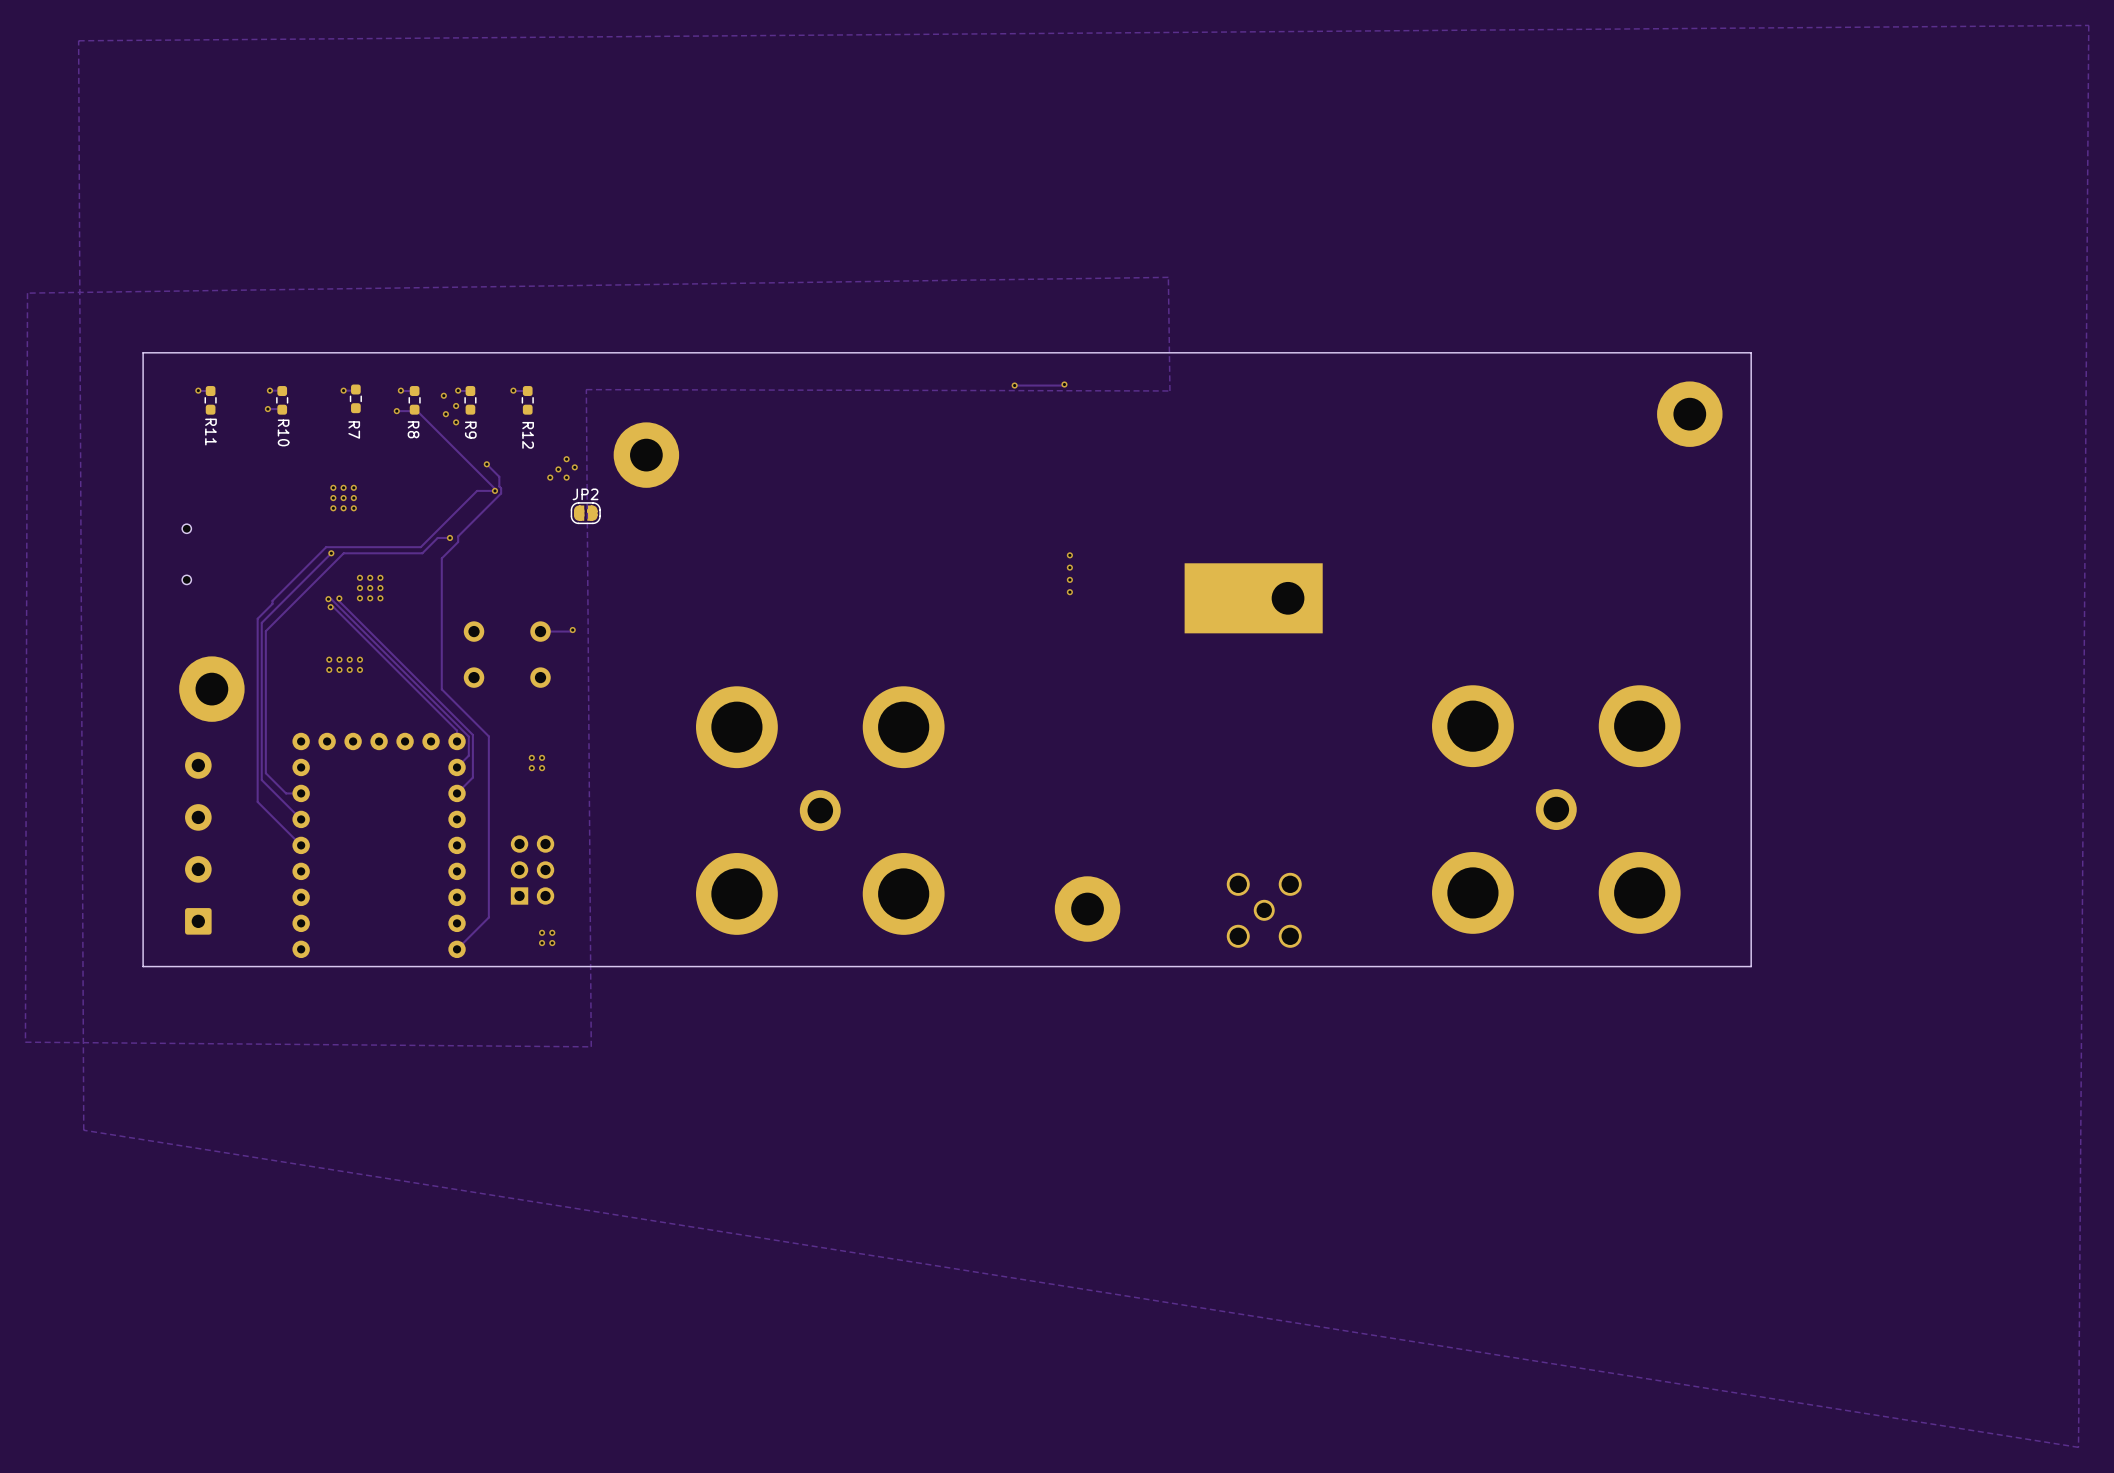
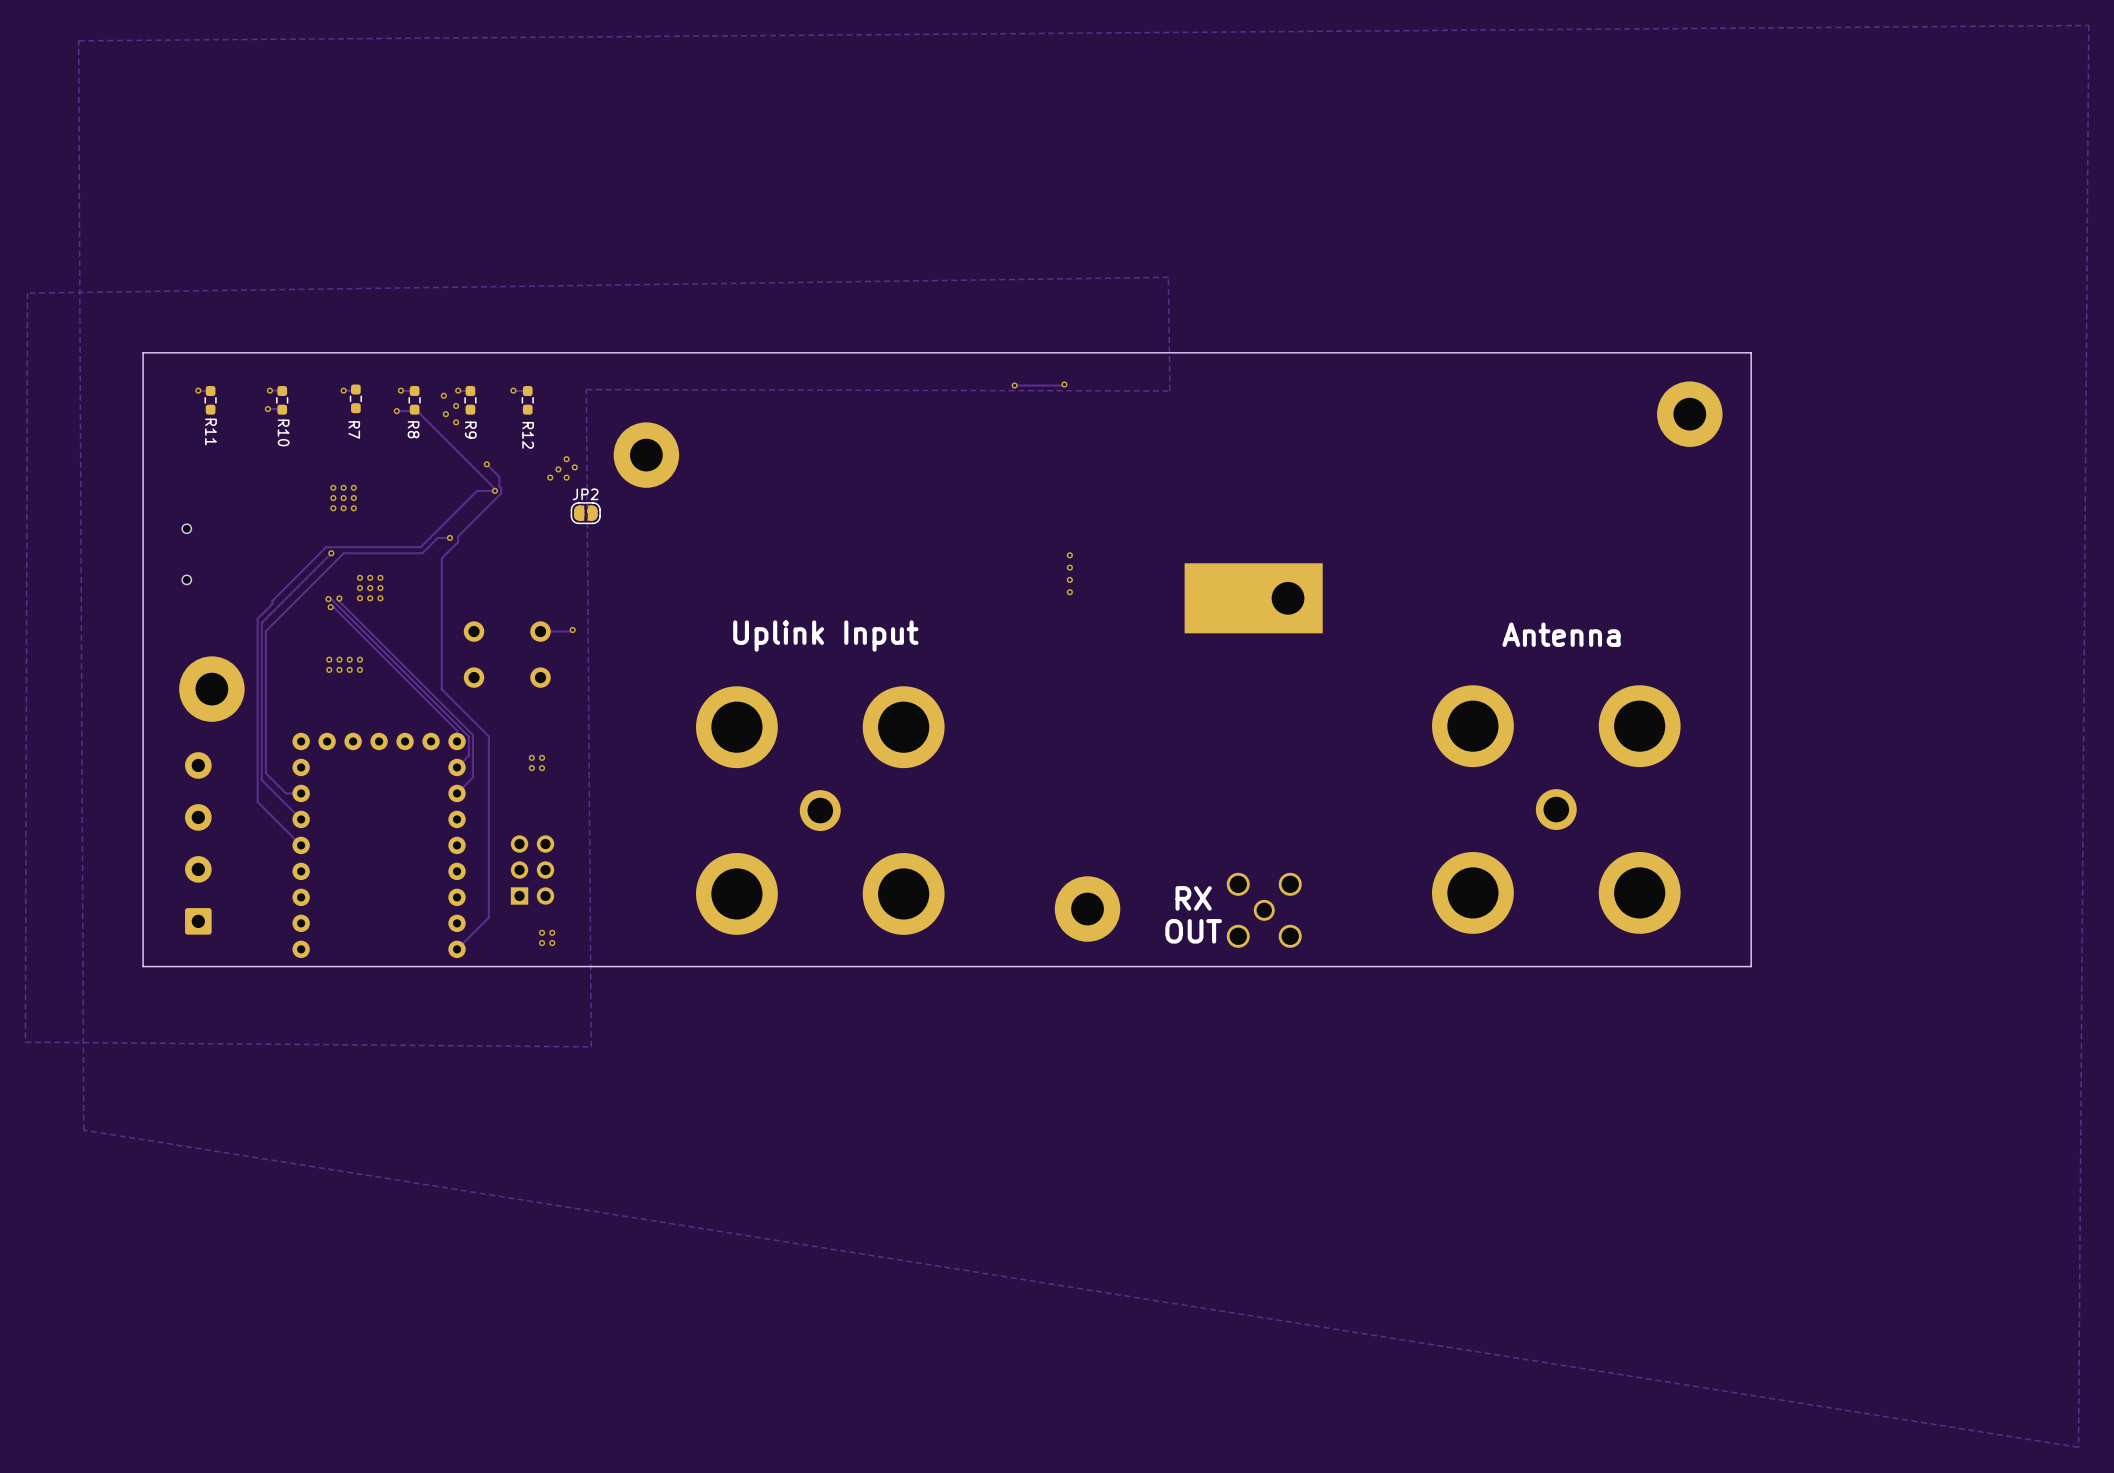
text: none -> Antenna (1561, 634)
text: none -> Uplink Input (825, 636)
text: none -> RX (1193, 898)
text: none -> OUT (1193, 931)

